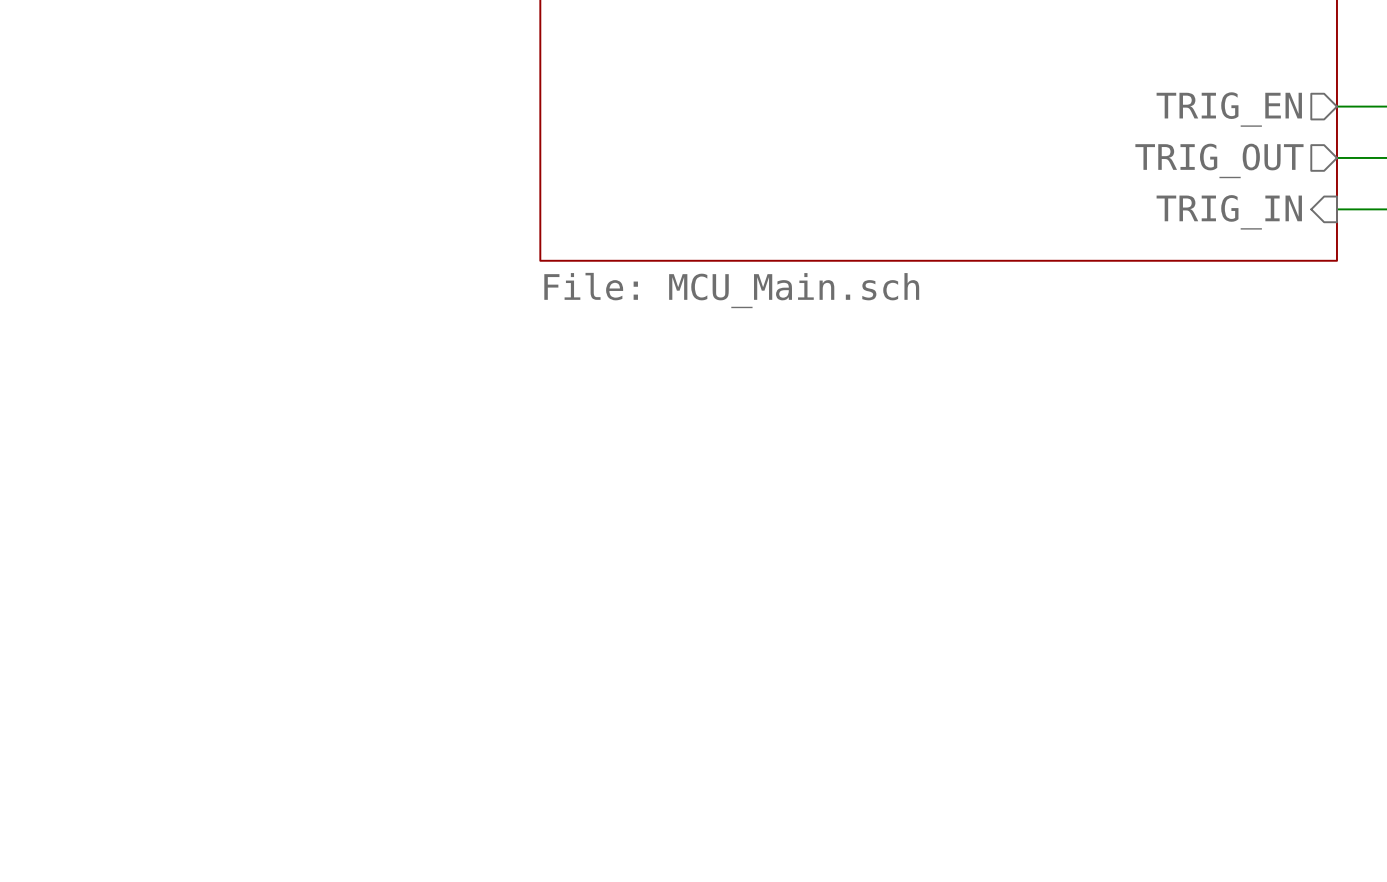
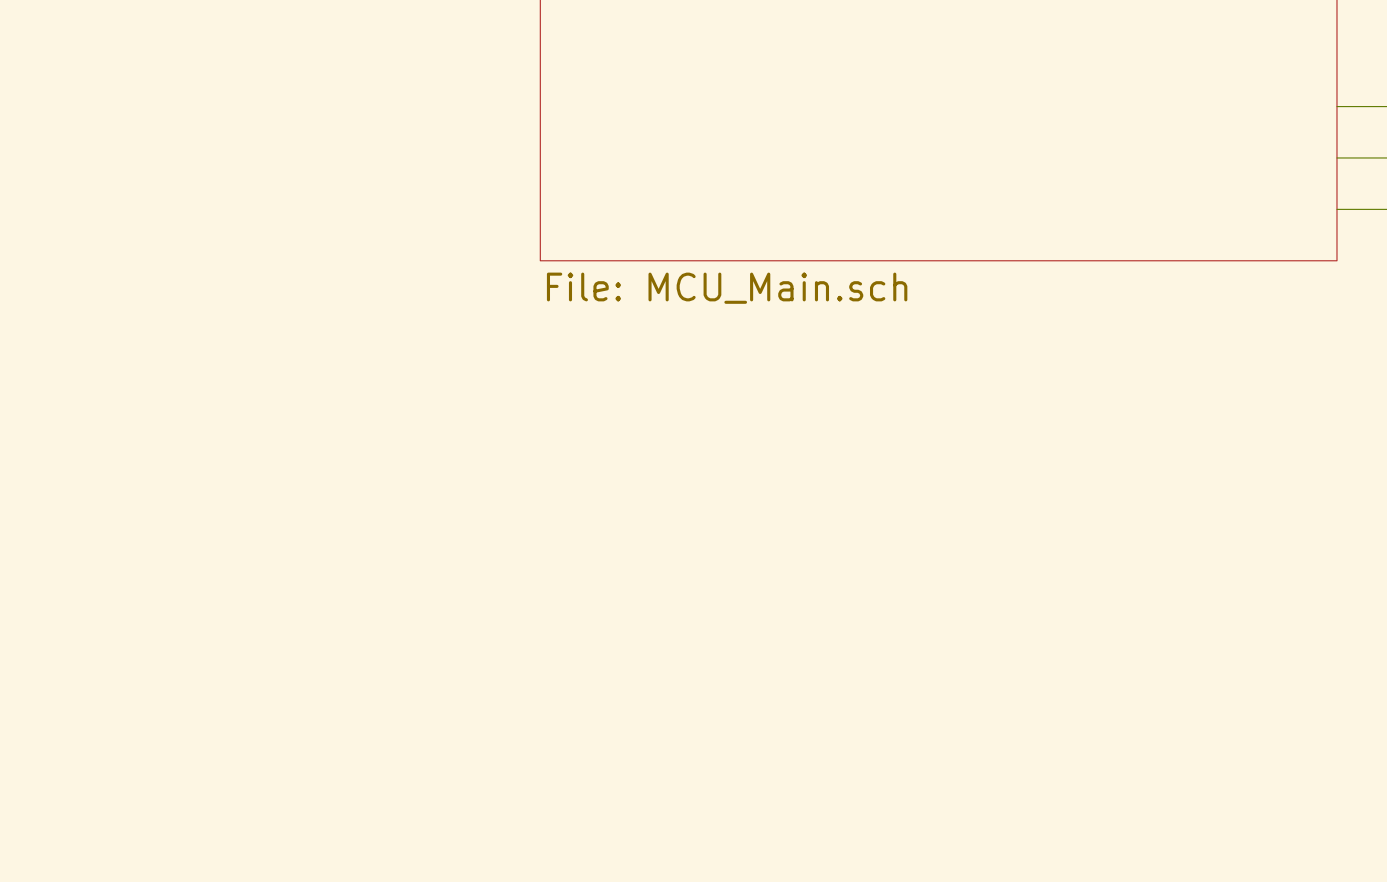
sheet pin: TRIG_EN (1229, 109) -> none
sheet pin: TRIG_OUT (1219, 160) -> none
sheet pin: TRIG_IN (1229, 212) -> none

